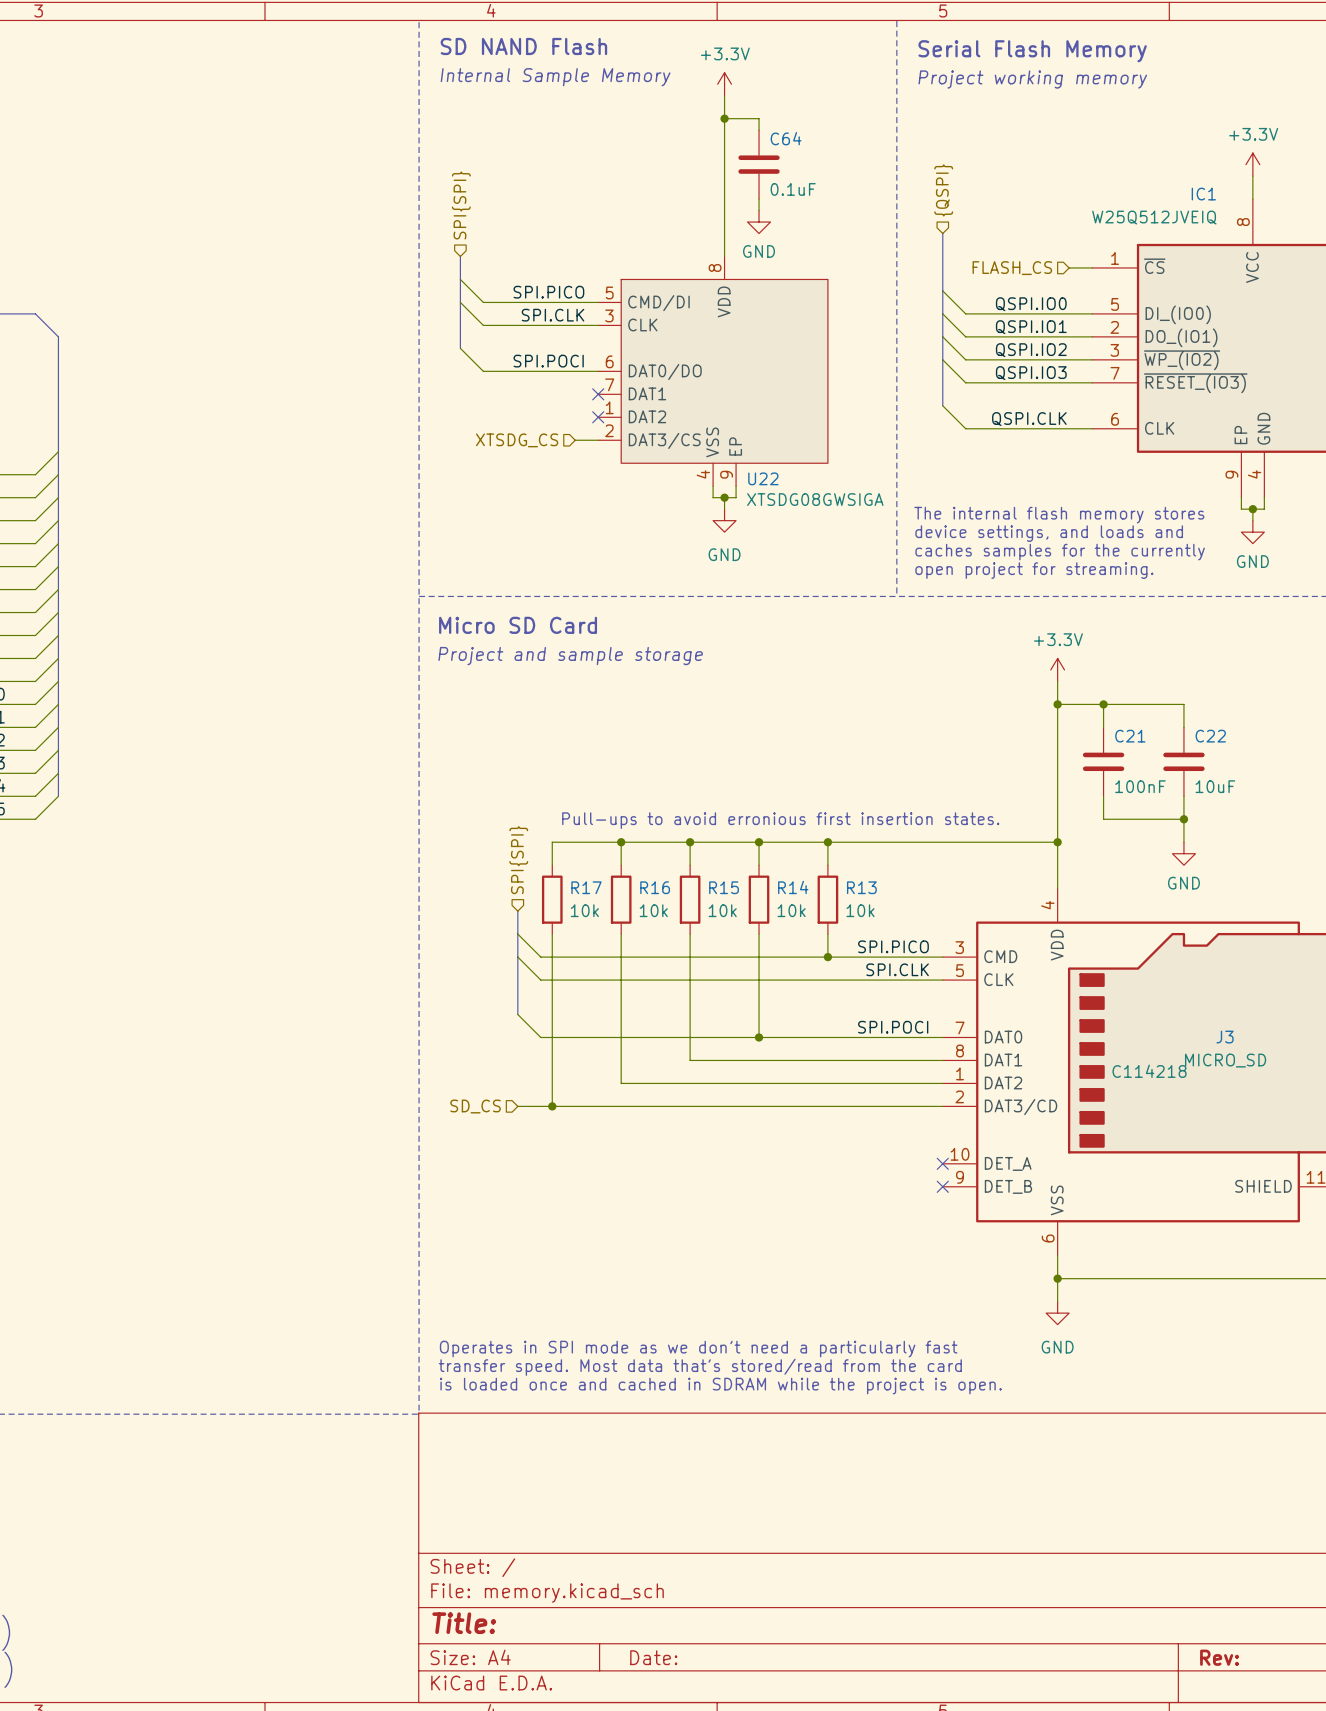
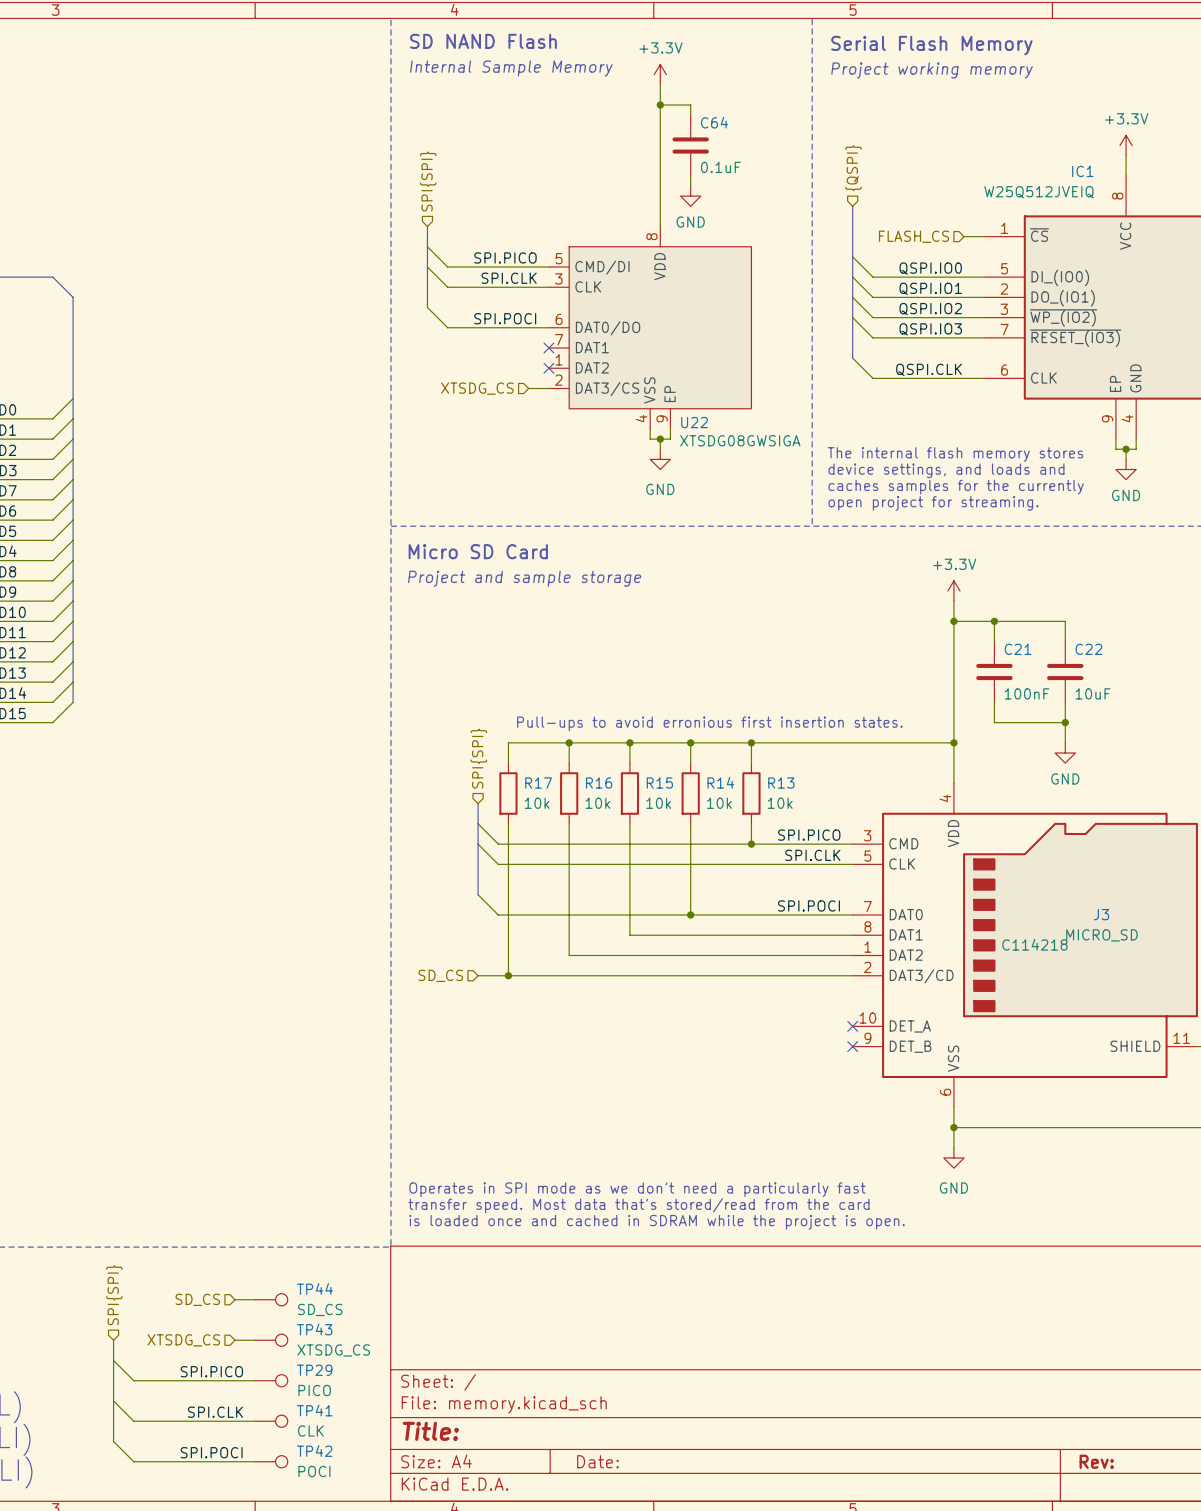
hierarchical label: none -> SPI{SPI} (114, 1295)
wire: none -> (235, 1299) (255, 1299)
TP44: none -> SD_CS (271, 1299)
hierarchical label: none -> SD_CS (197, 1299)
bus: none -> (113, 1340) (113, 1441)
hierarchical label: none -> XTSDG_CS (183, 1340)
wire: none -> (235, 1340) (255, 1340)
TP43: none -> XTSDG_CS (271, 1340)
wire: none -> (113, 1360) (133, 1380) (255, 1380)
label: none -> SPI.PICO (211, 1371)
TP29: none -> PICO (271, 1380)
wire: none -> (113, 1400) (133, 1421) (255, 1421)
label: none -> SPI.CLK (215, 1412)
TP41: none -> CLK (271, 1421)
wire: none -> (113, 1441) (133, 1461) (255, 1461)
label: none -> SPI.POCI (211, 1452)
TP42: none -> POCI (271, 1461)

